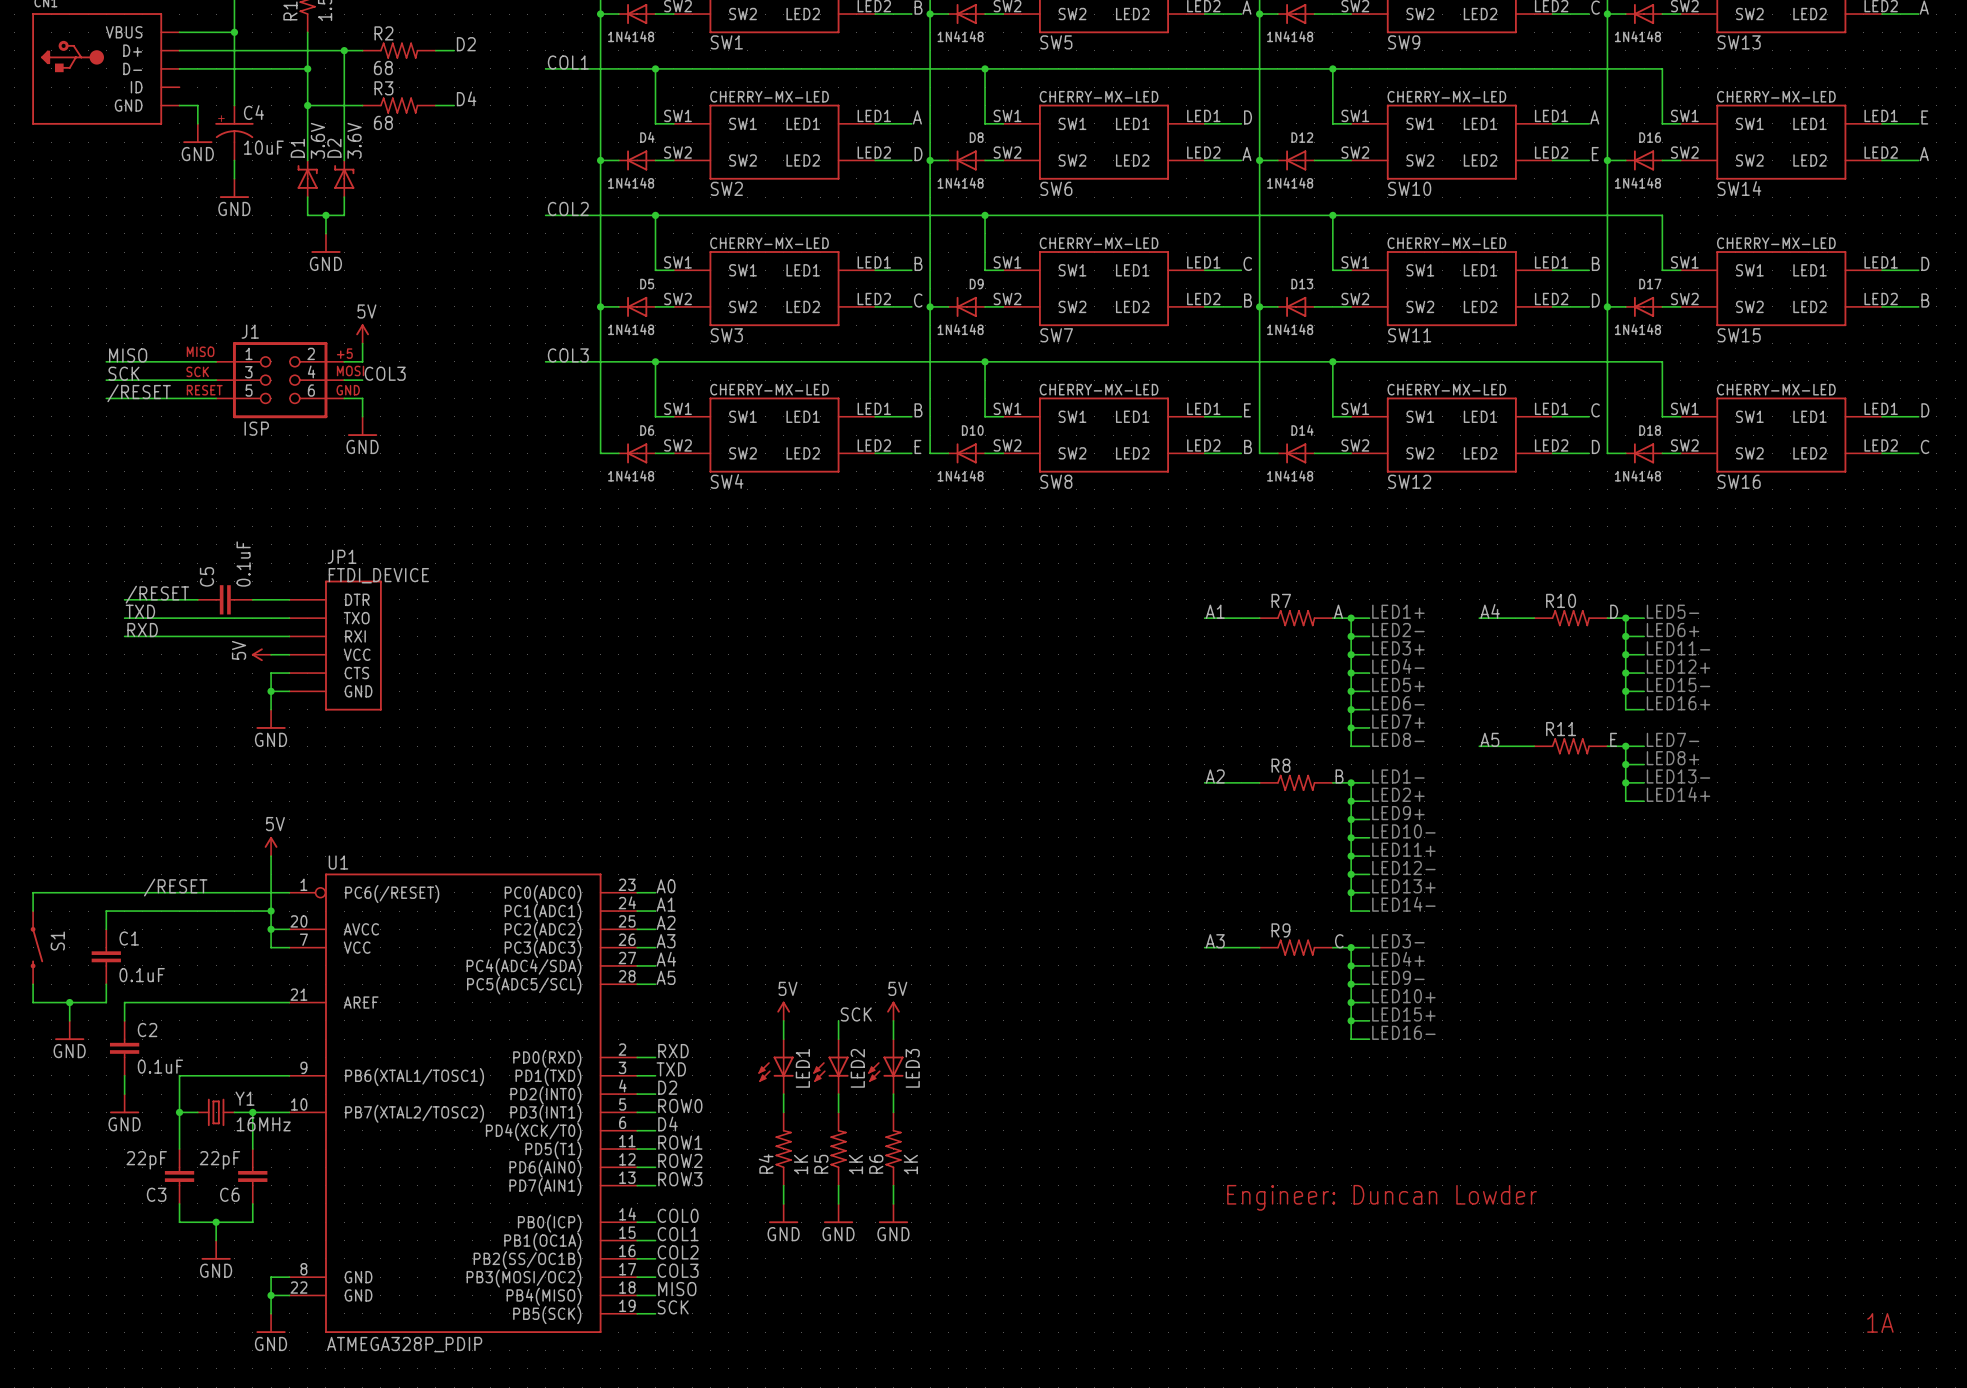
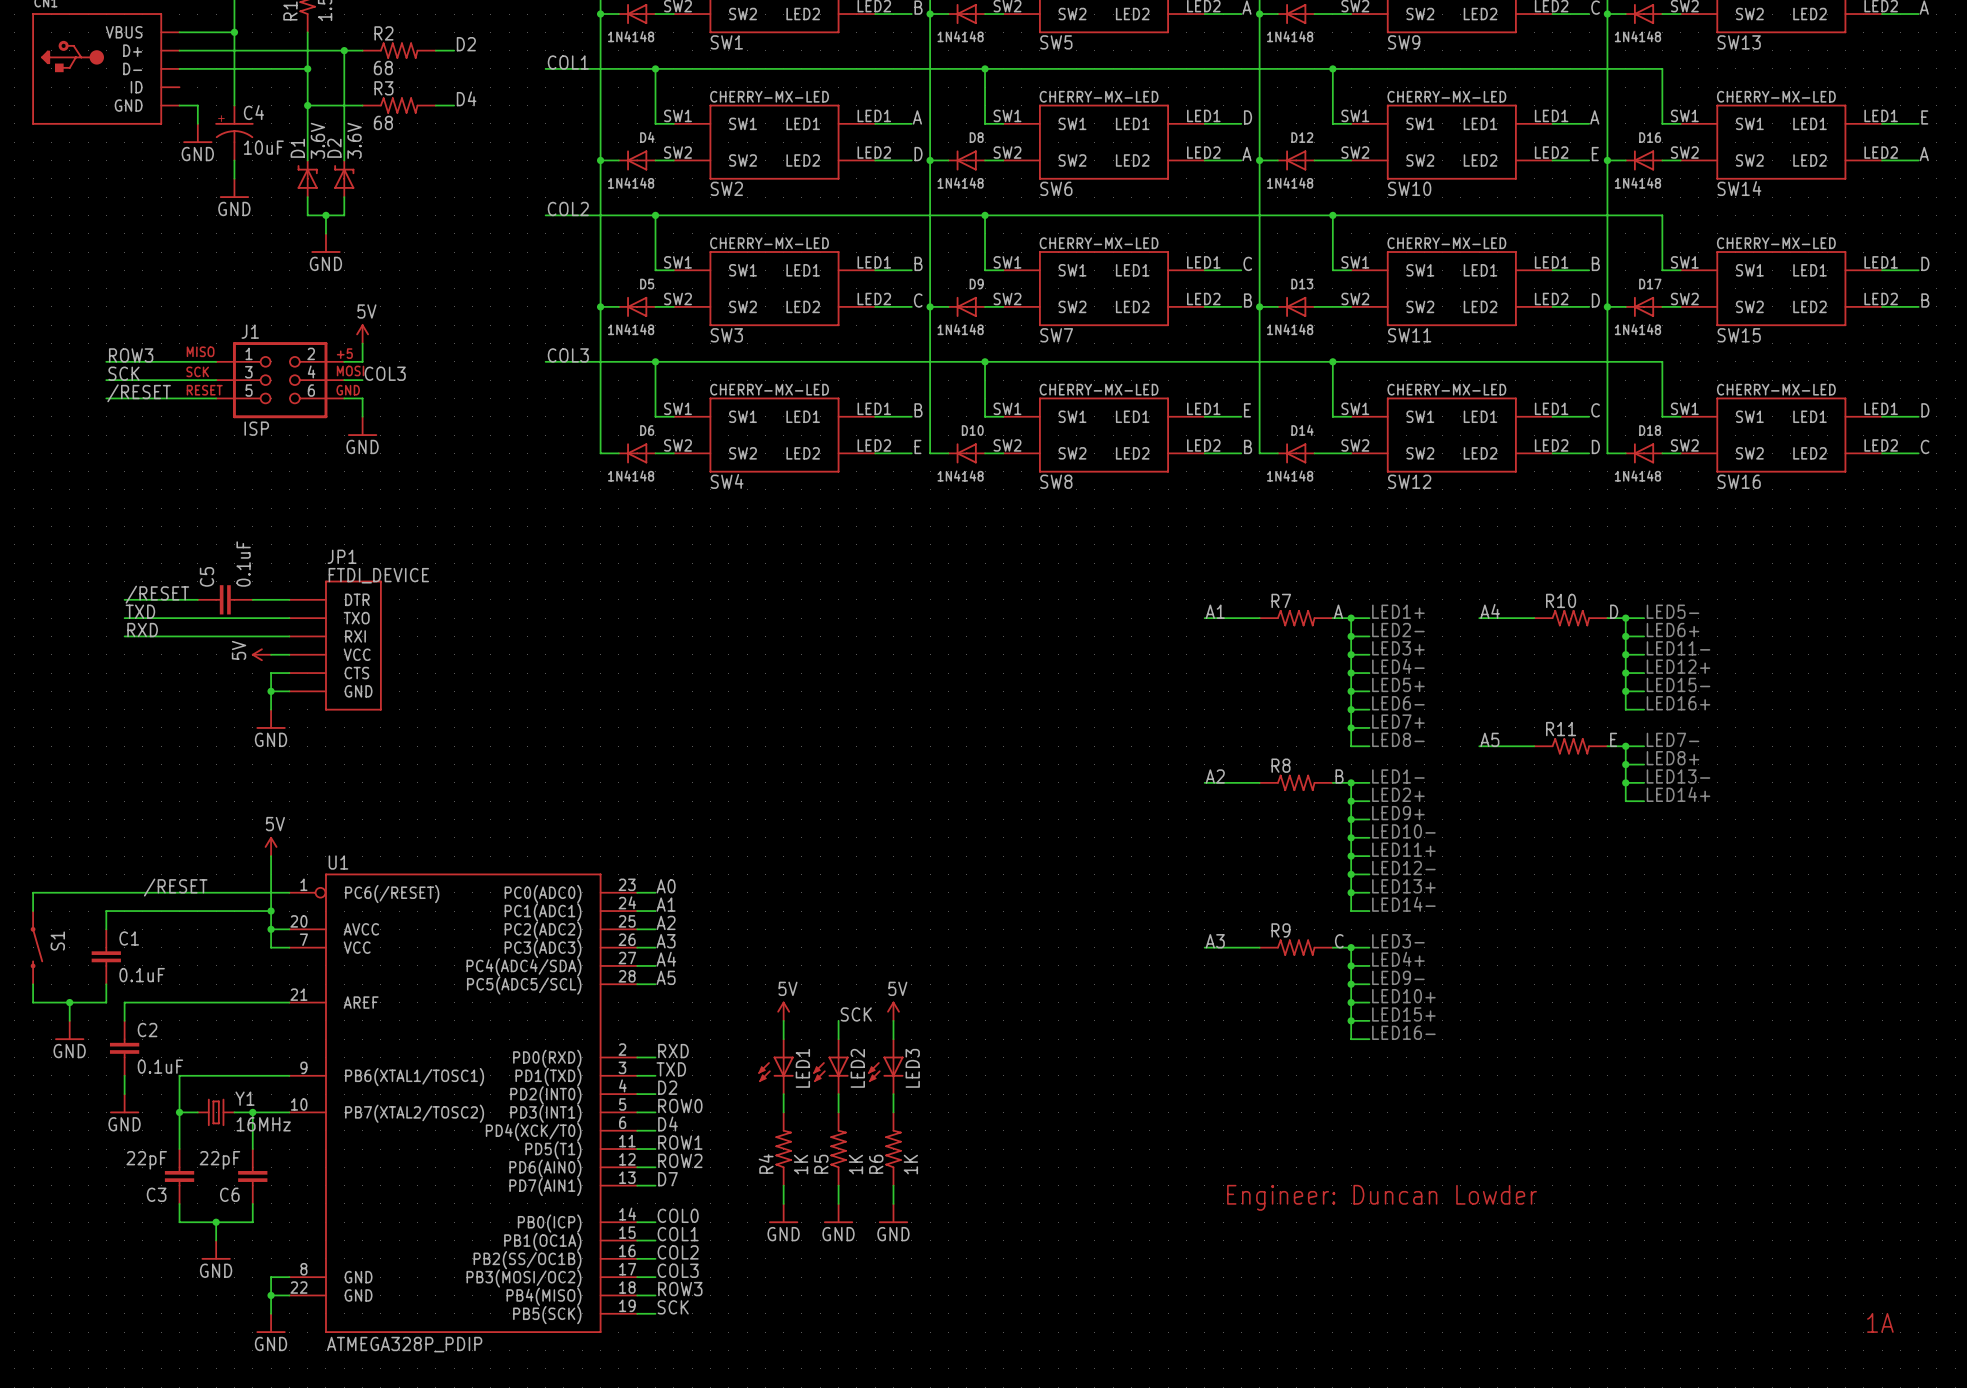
label: MISO (128, 355) -> ROW3 (131, 355)
label: ROW3 (680, 1179) -> D7 (667, 1179)
label: MISO (677, 1289) -> ROW3 (680, 1289)

